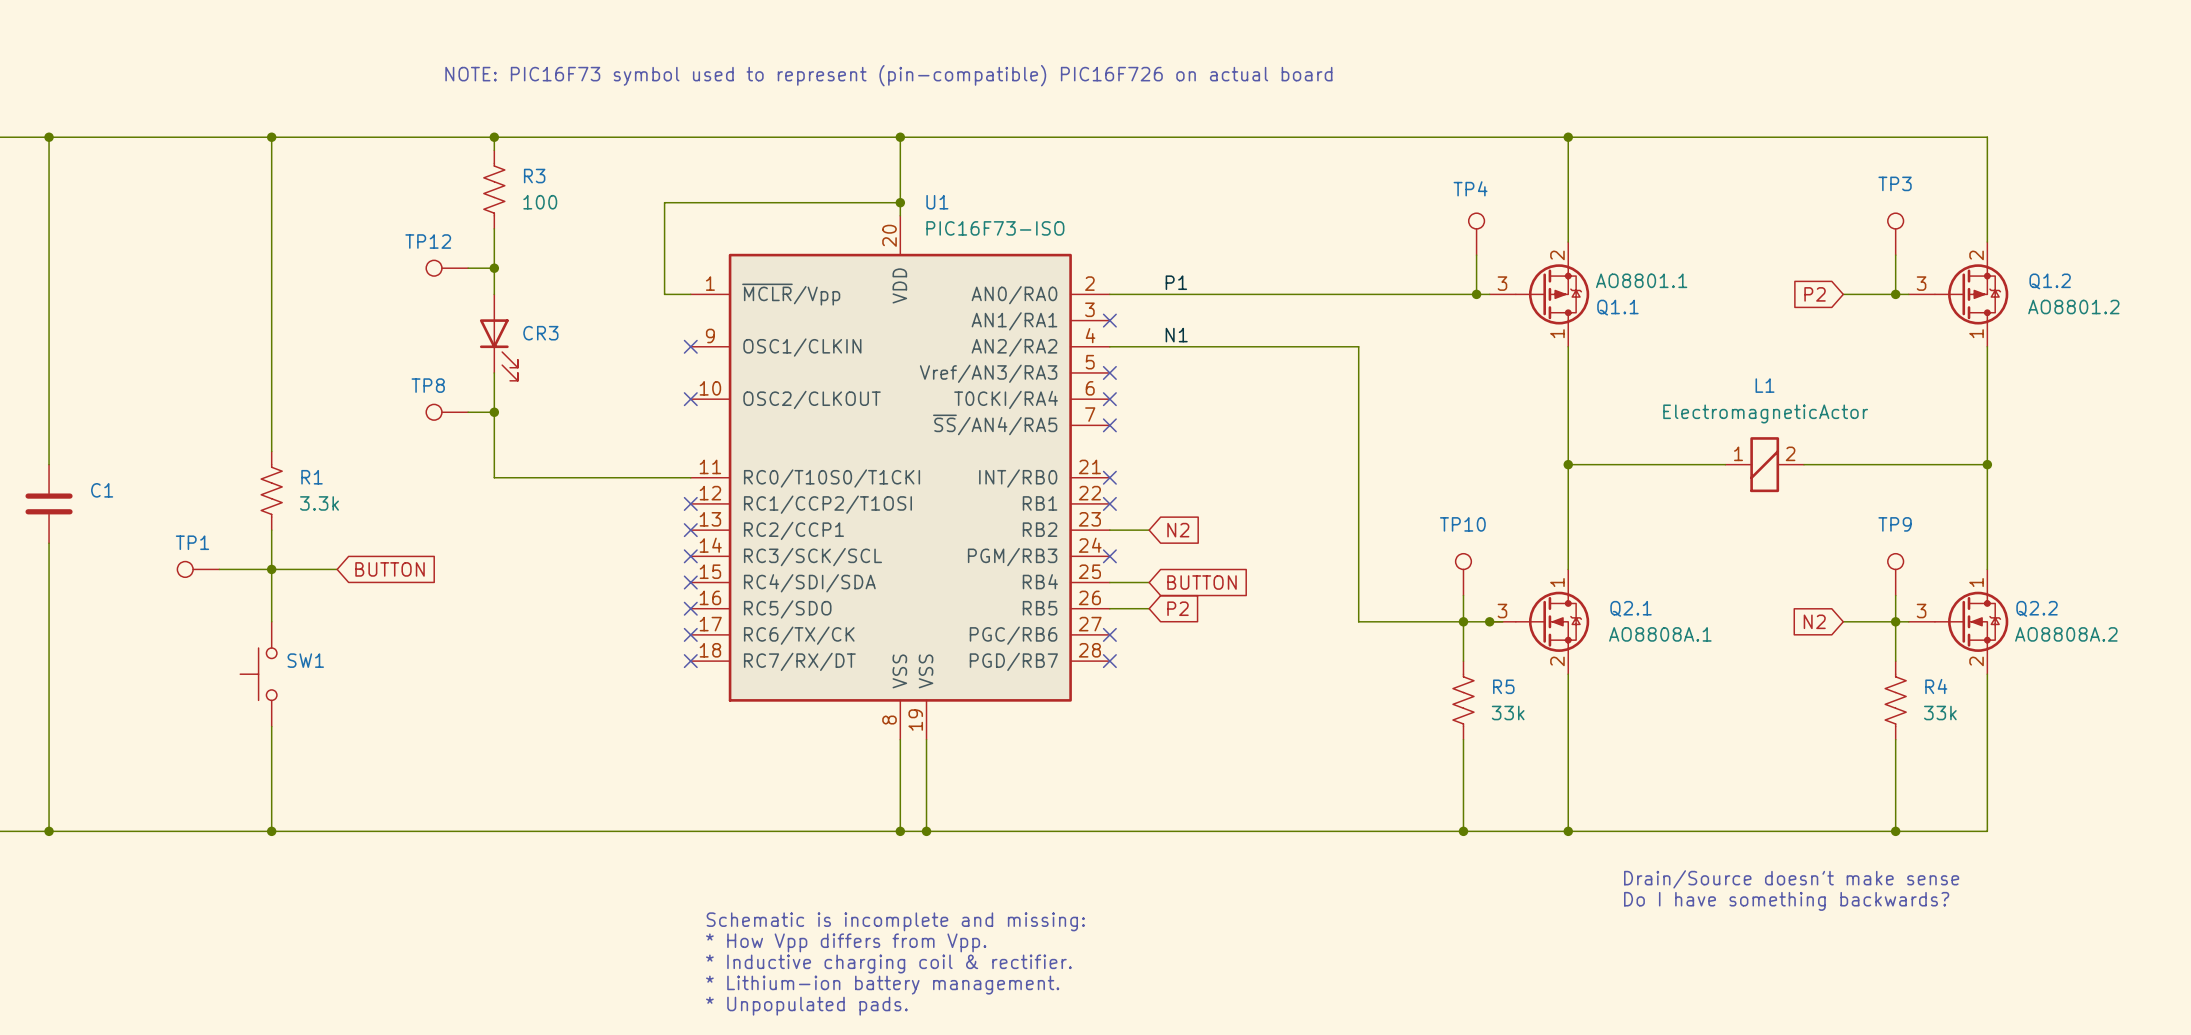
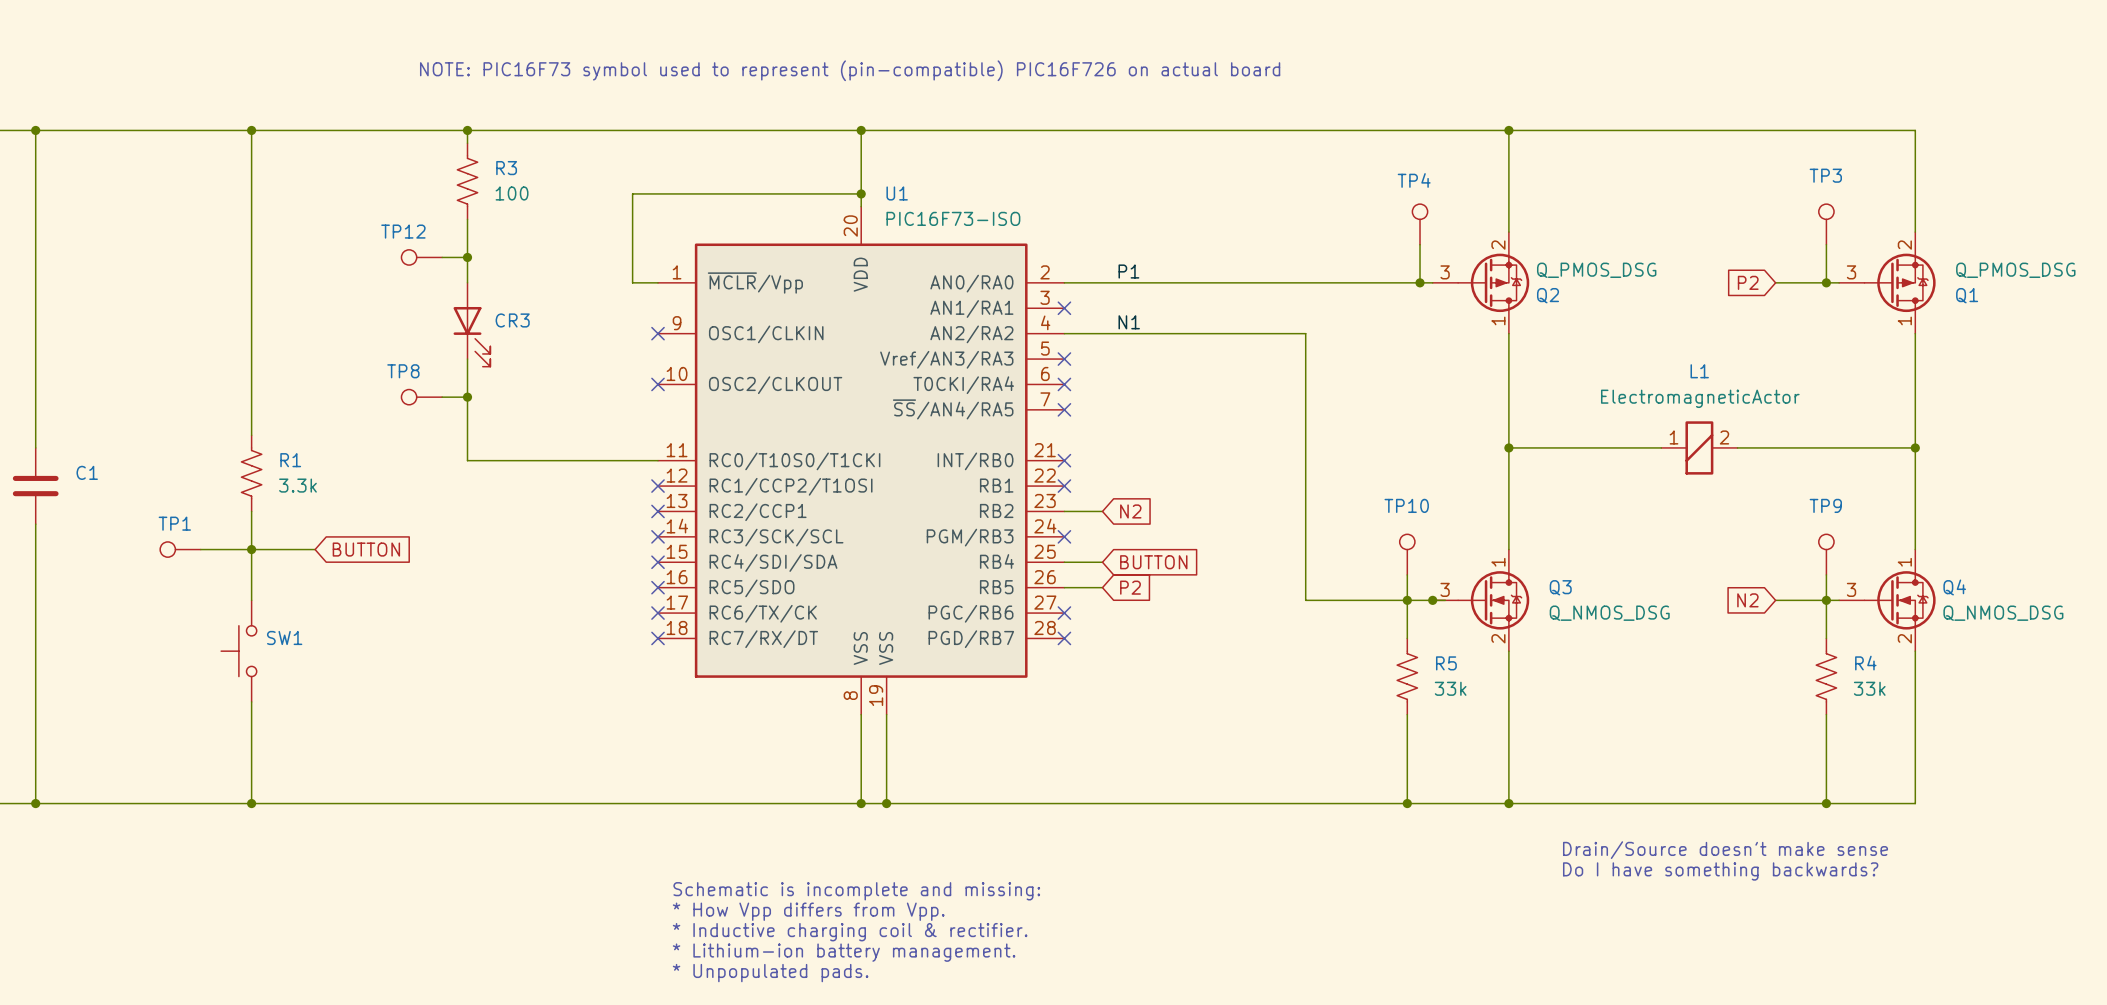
Q1.1 value: AO8801.1 (1641, 280) -> Q_PMOS_DSG (1596, 270)
Q1.2 name: Q1.2 (2050, 281) -> Q1 (1967, 295)
Q1.1 name: Q1.1 (1617, 307) -> Q2 (1548, 295)
Q1.2 value: AO8801.2 (2073, 307) -> Q_PMOS_DSG (2015, 270)
Q2.1 name: Q2.1 (1631, 608) -> Q3 (1560, 587)
Q2.2 name: Q2.2 (2037, 608) -> Q4 (1954, 587)
Q2.1 value: AO8808A.1 (1660, 634) -> Q_NMOS_DSG (1609, 613)
Q2.2 value: AO8808A.2 (2066, 634) -> Q_NMOS_DSG (2003, 613)

